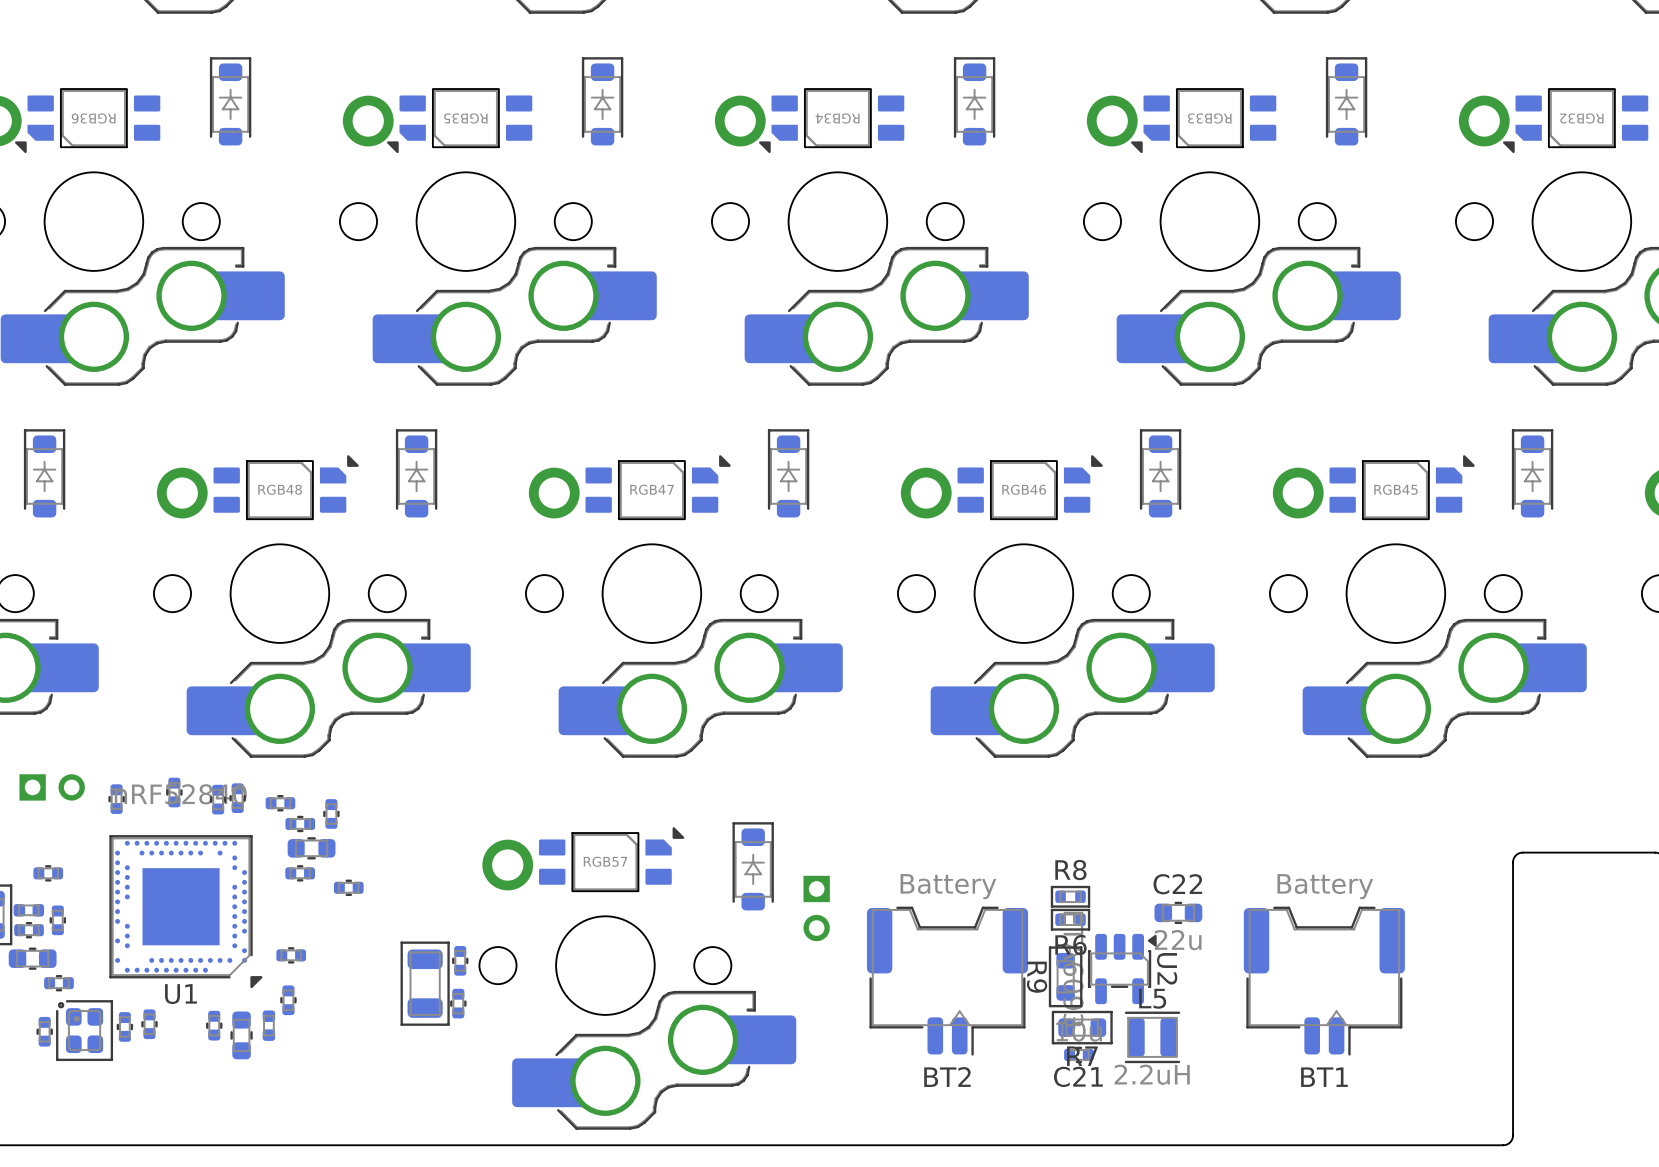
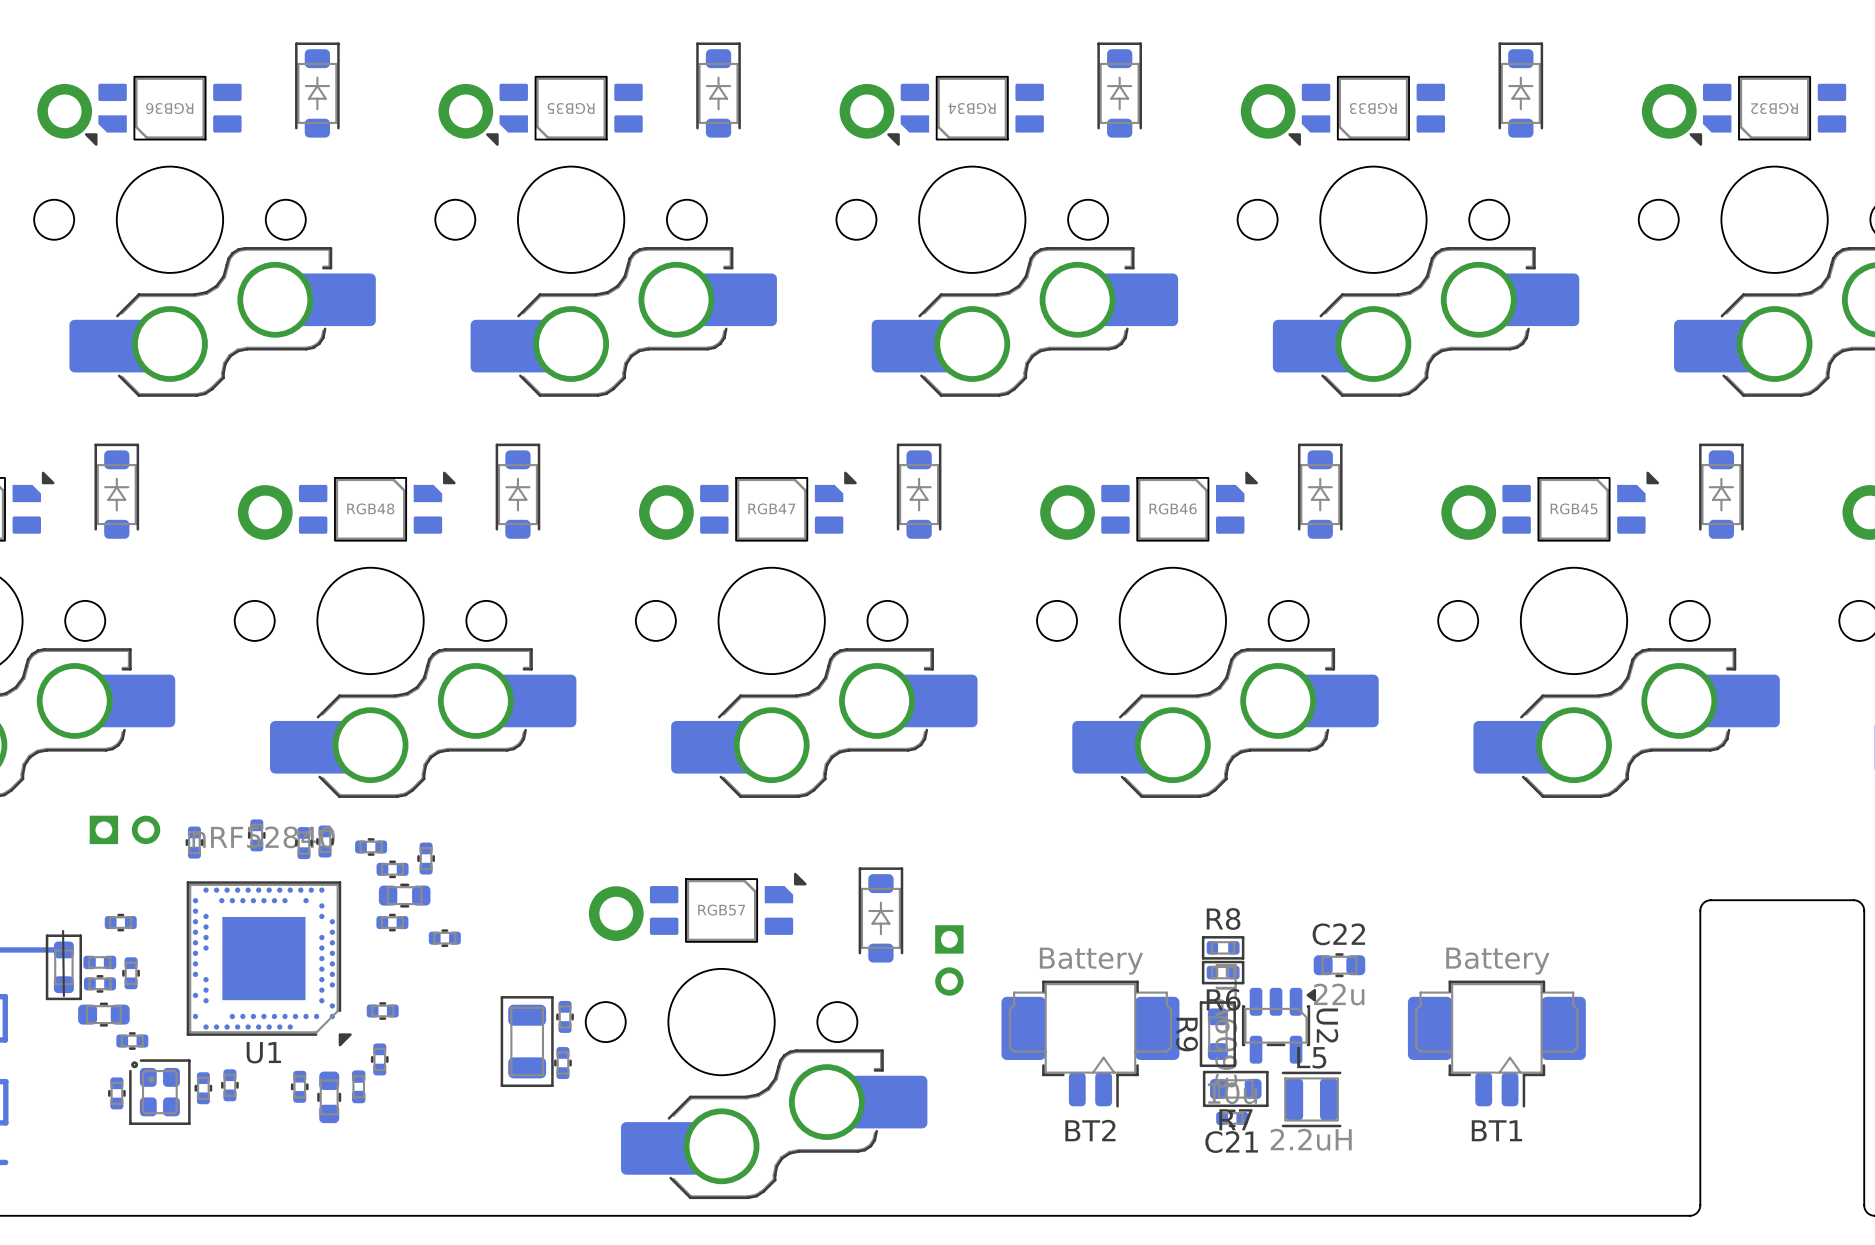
BT2 footprint: [866, 906, 1029, 1056] -> [1001, 980, 1180, 1108]
BT1 footprint: [1243, 906, 1405, 1056] -> [1407, 980, 1586, 1108]

